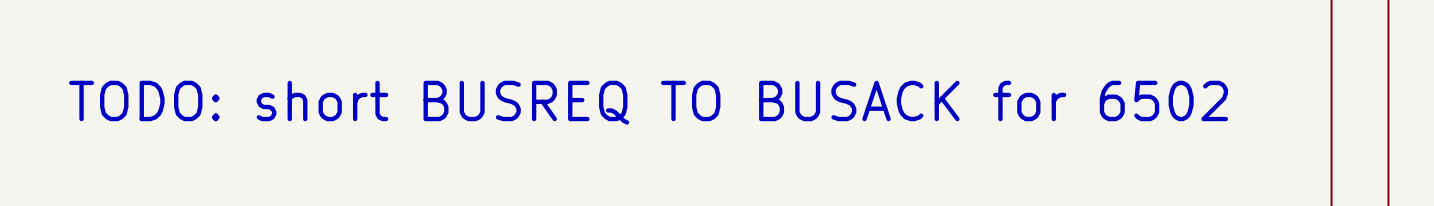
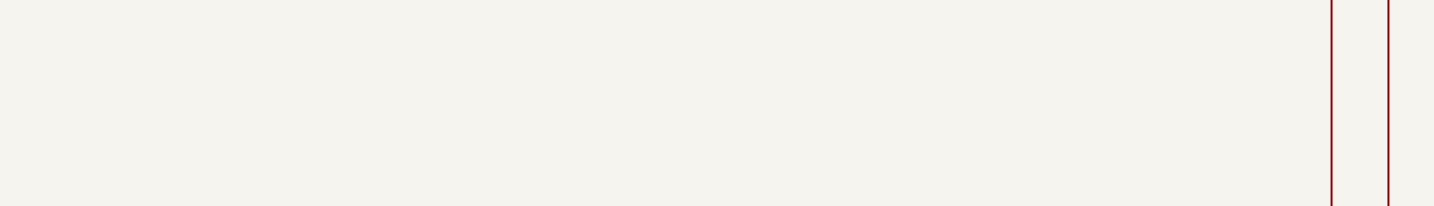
text: TODO: short BUSREQ TO BUSACK for 6502 (648, 102) -> none

